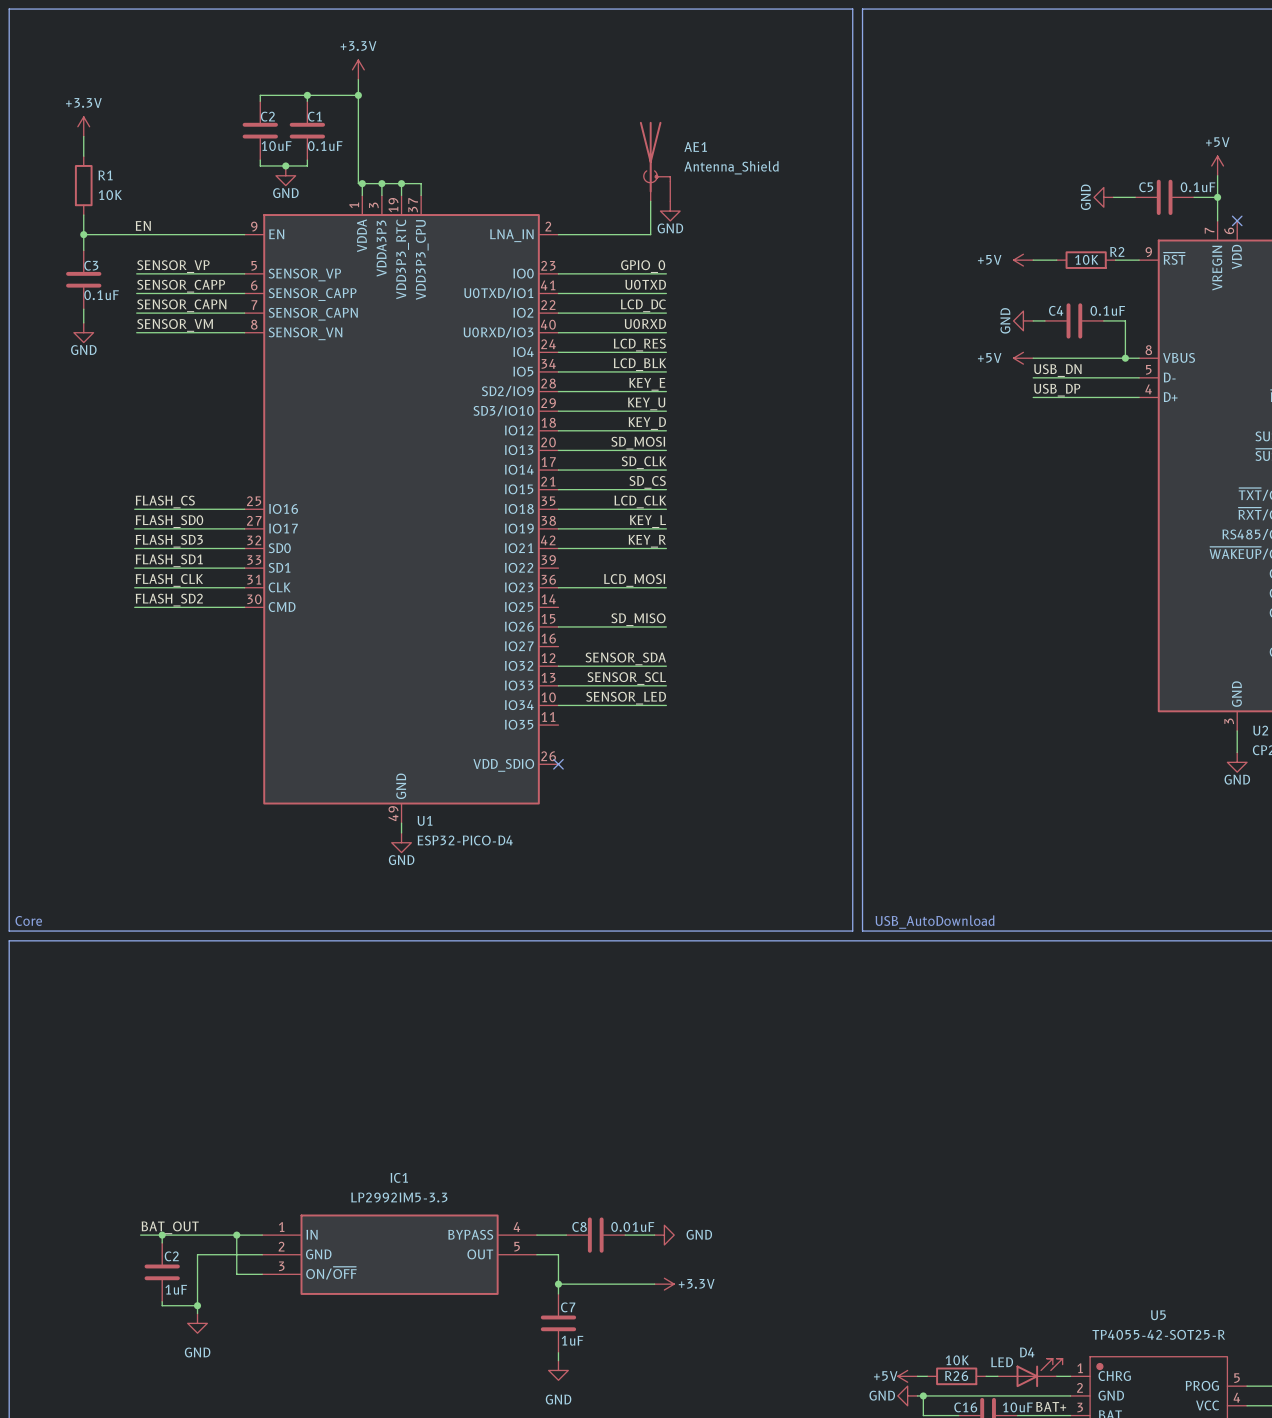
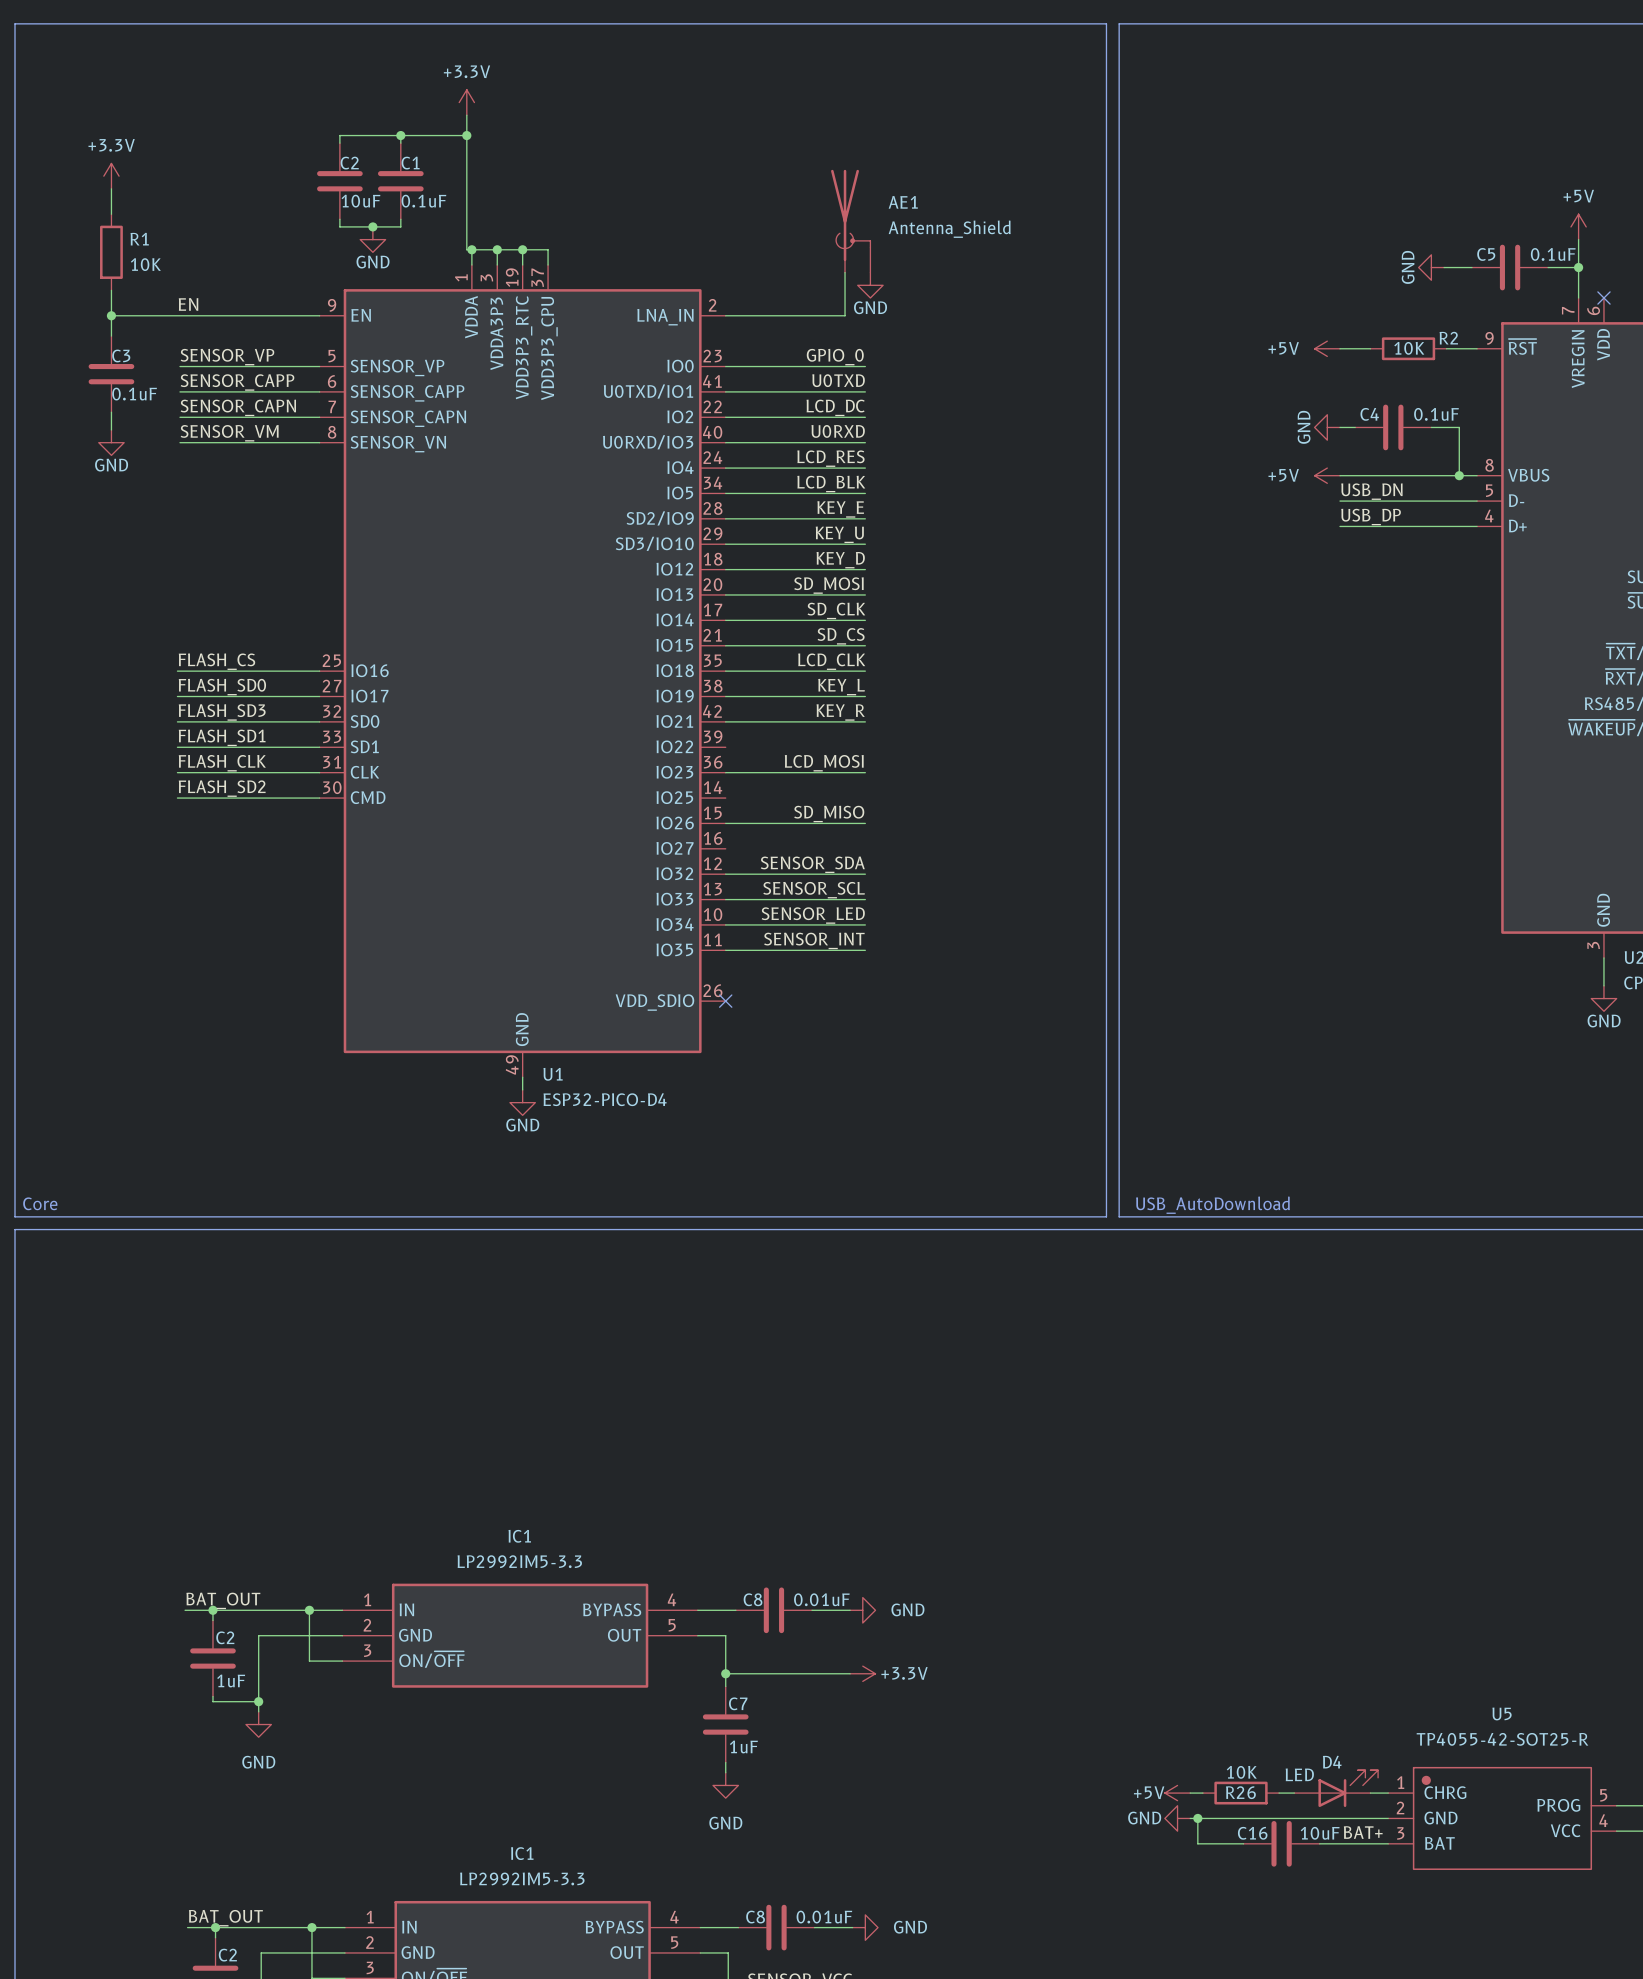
label: none -> SENSOR_INT (814, 940)
wire: none -> (725, 950) (865, 950)

